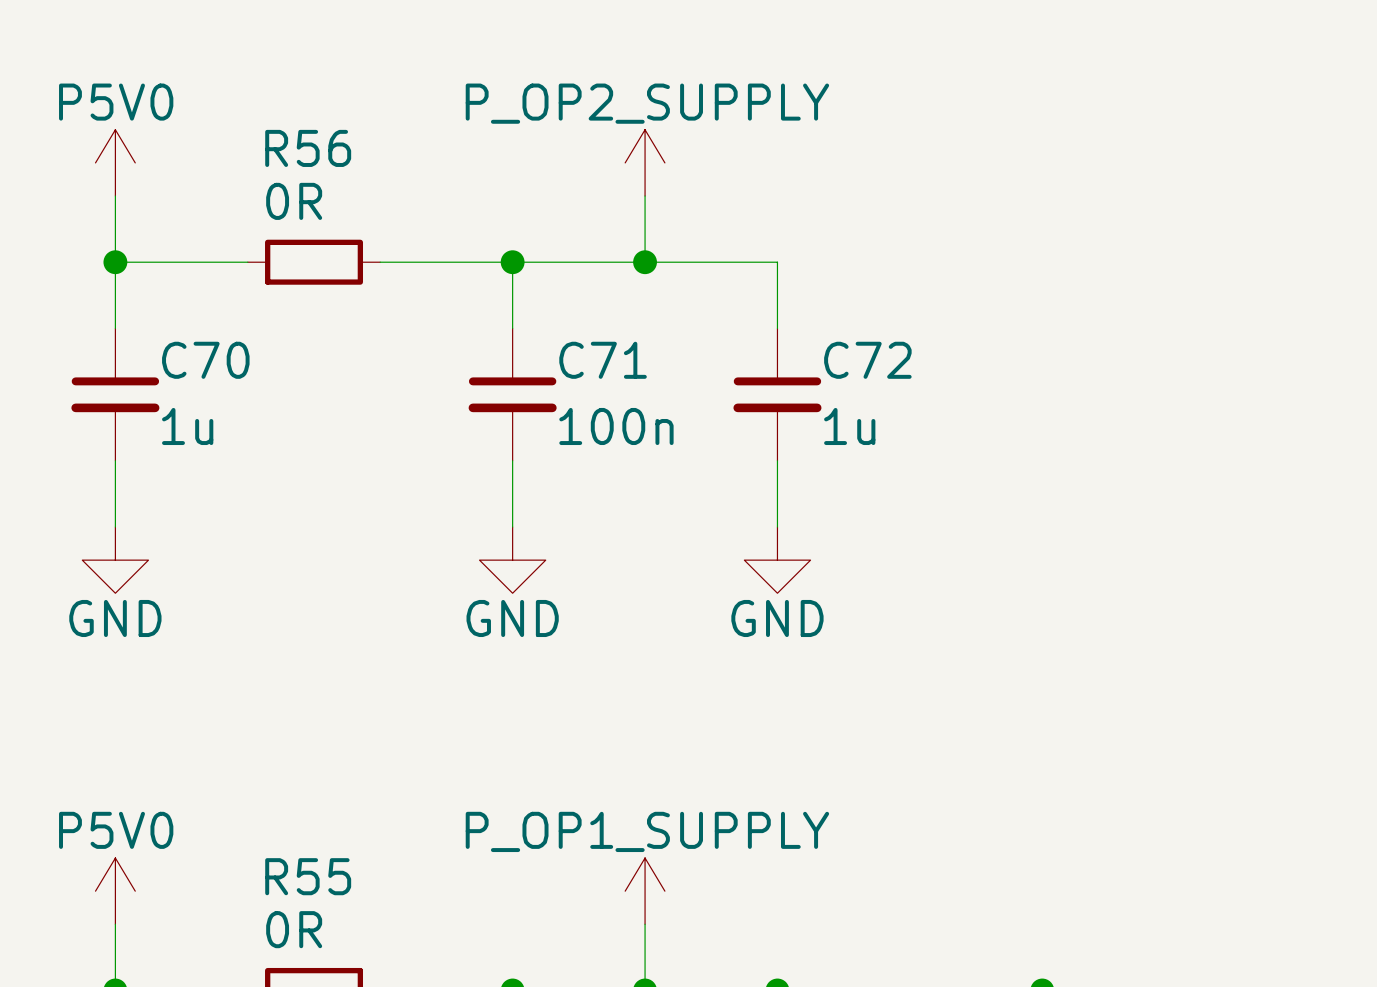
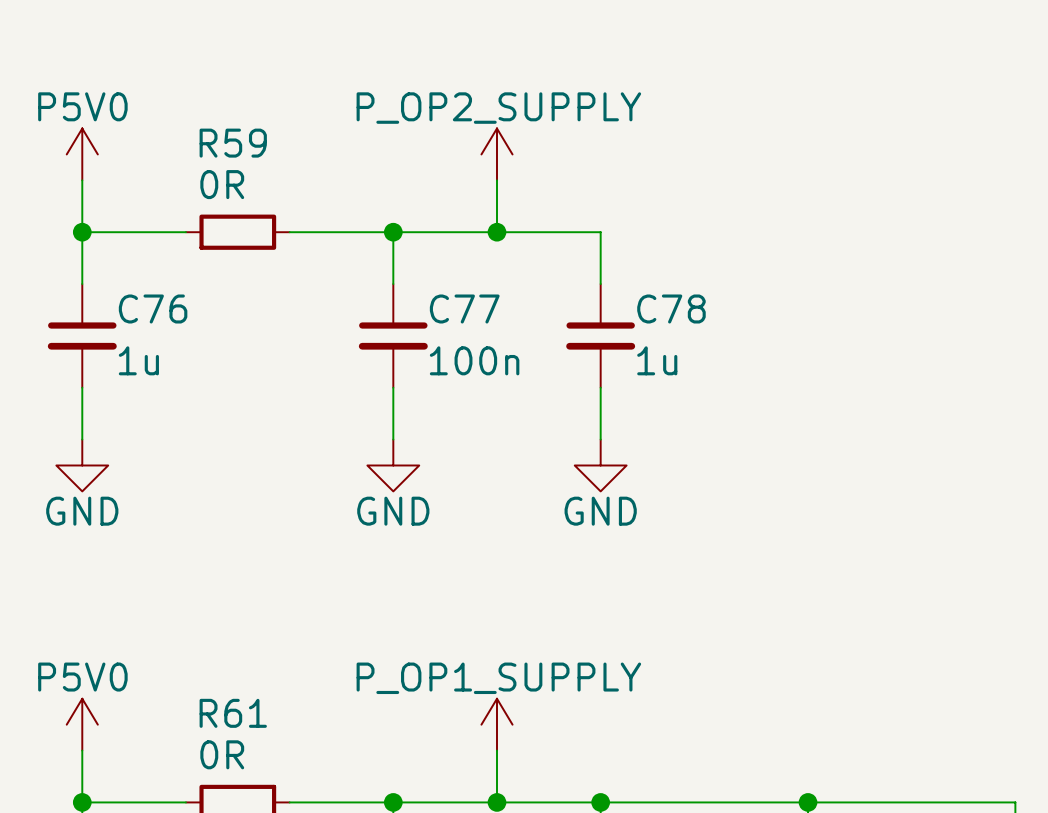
R56 name: R56 (308, 148) -> R59 (233, 143)
C70 name: C70 (205, 360) -> C76 (153, 308)
C71 name: C71 (603, 360) -> C77 (464, 308)
C72 name: C72 (867, 360) -> C78 (671, 308)
R55 name: R55 (308, 876) -> R61 (233, 713)

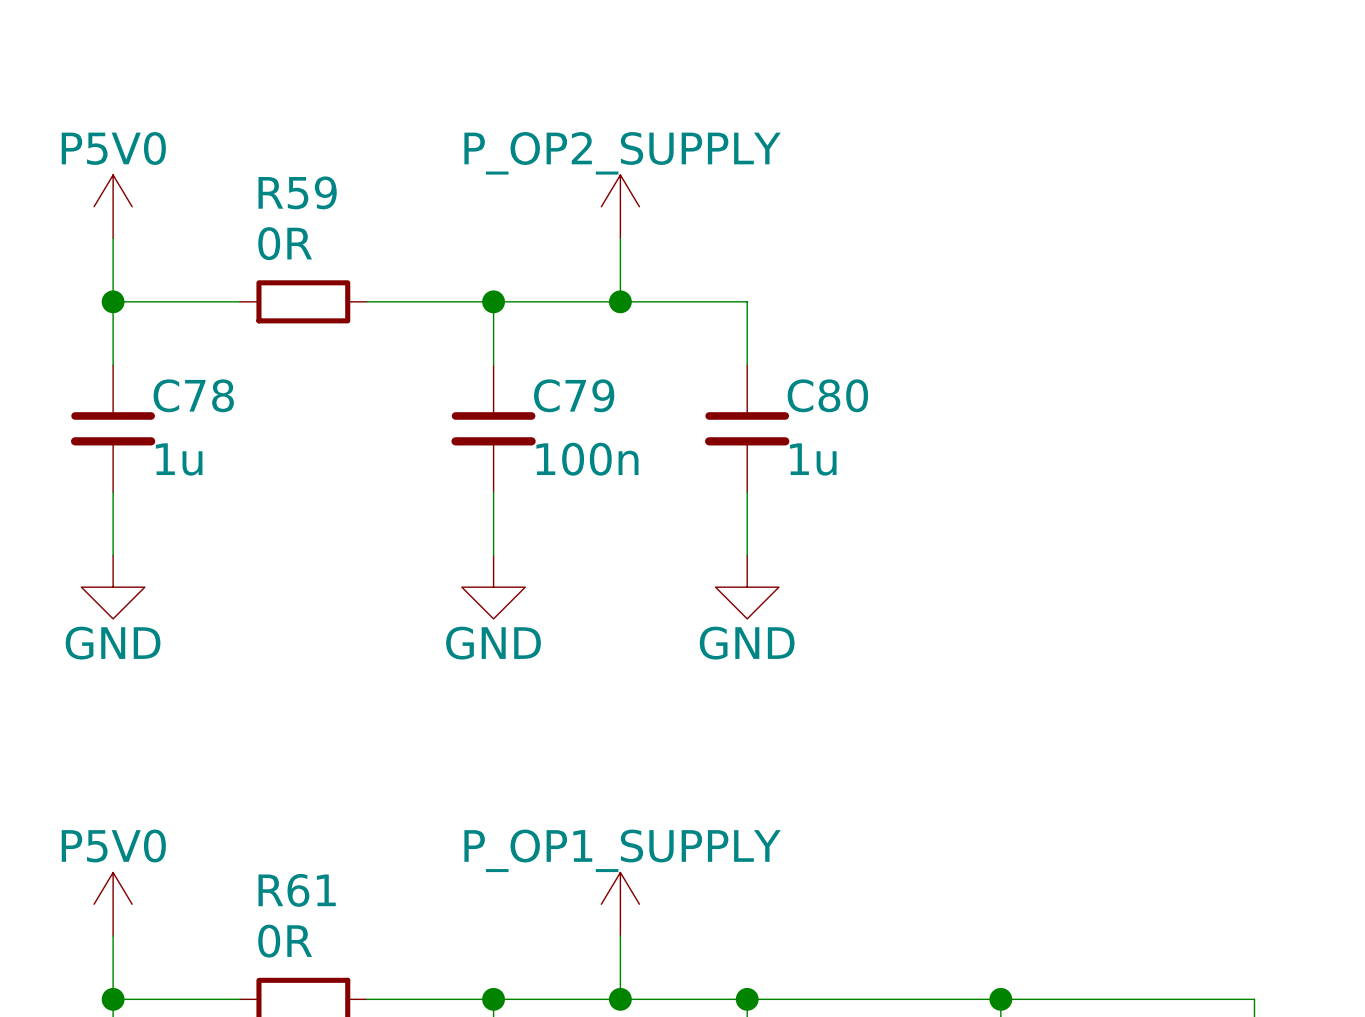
C76 name: C76 (153, 308) -> C78 (193, 395)
C77 name: C77 (464, 308) -> C79 (574, 395)
C78 name: C78 (671, 308) -> C80 (827, 395)

